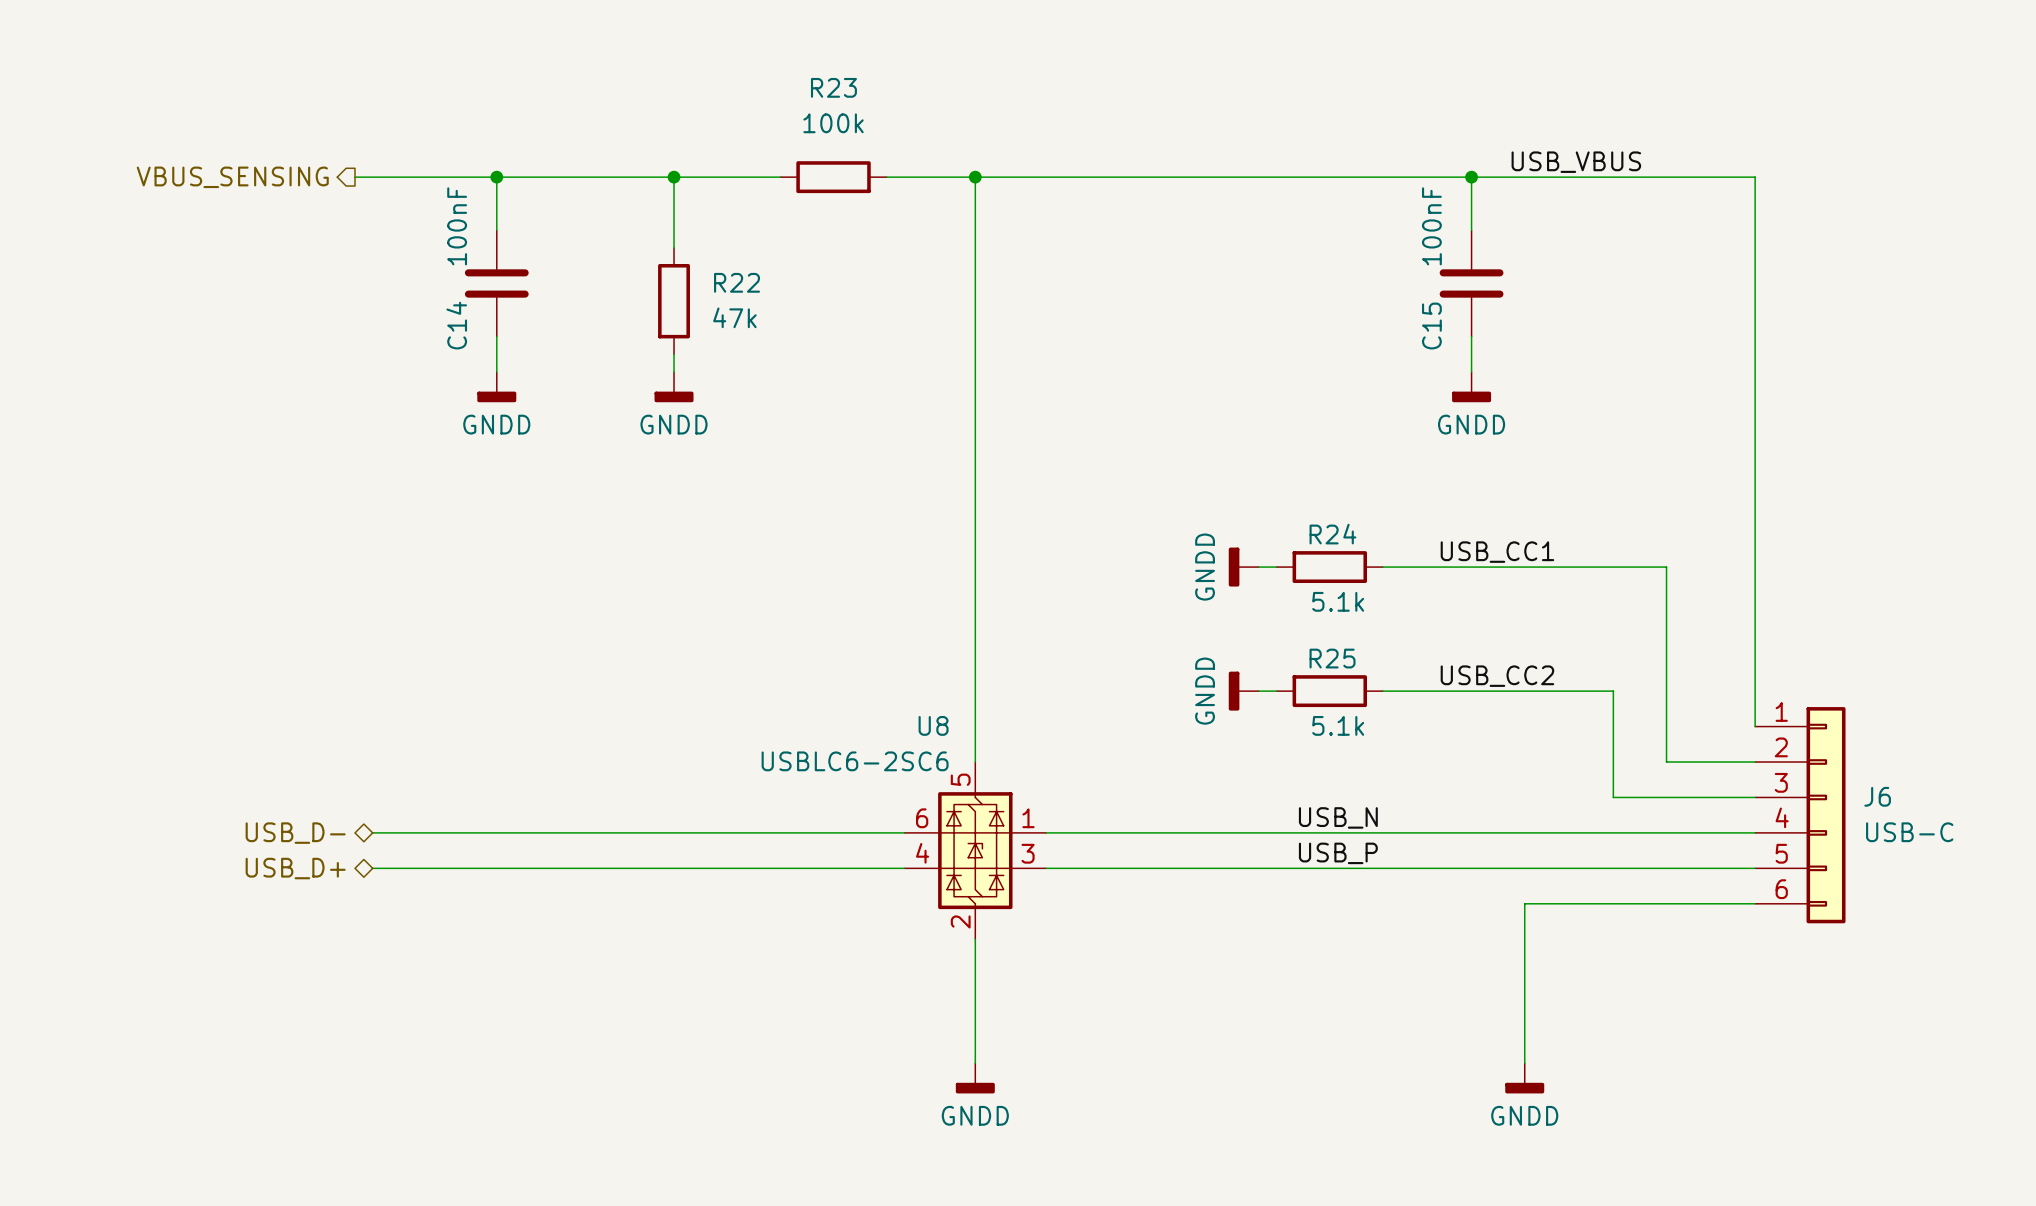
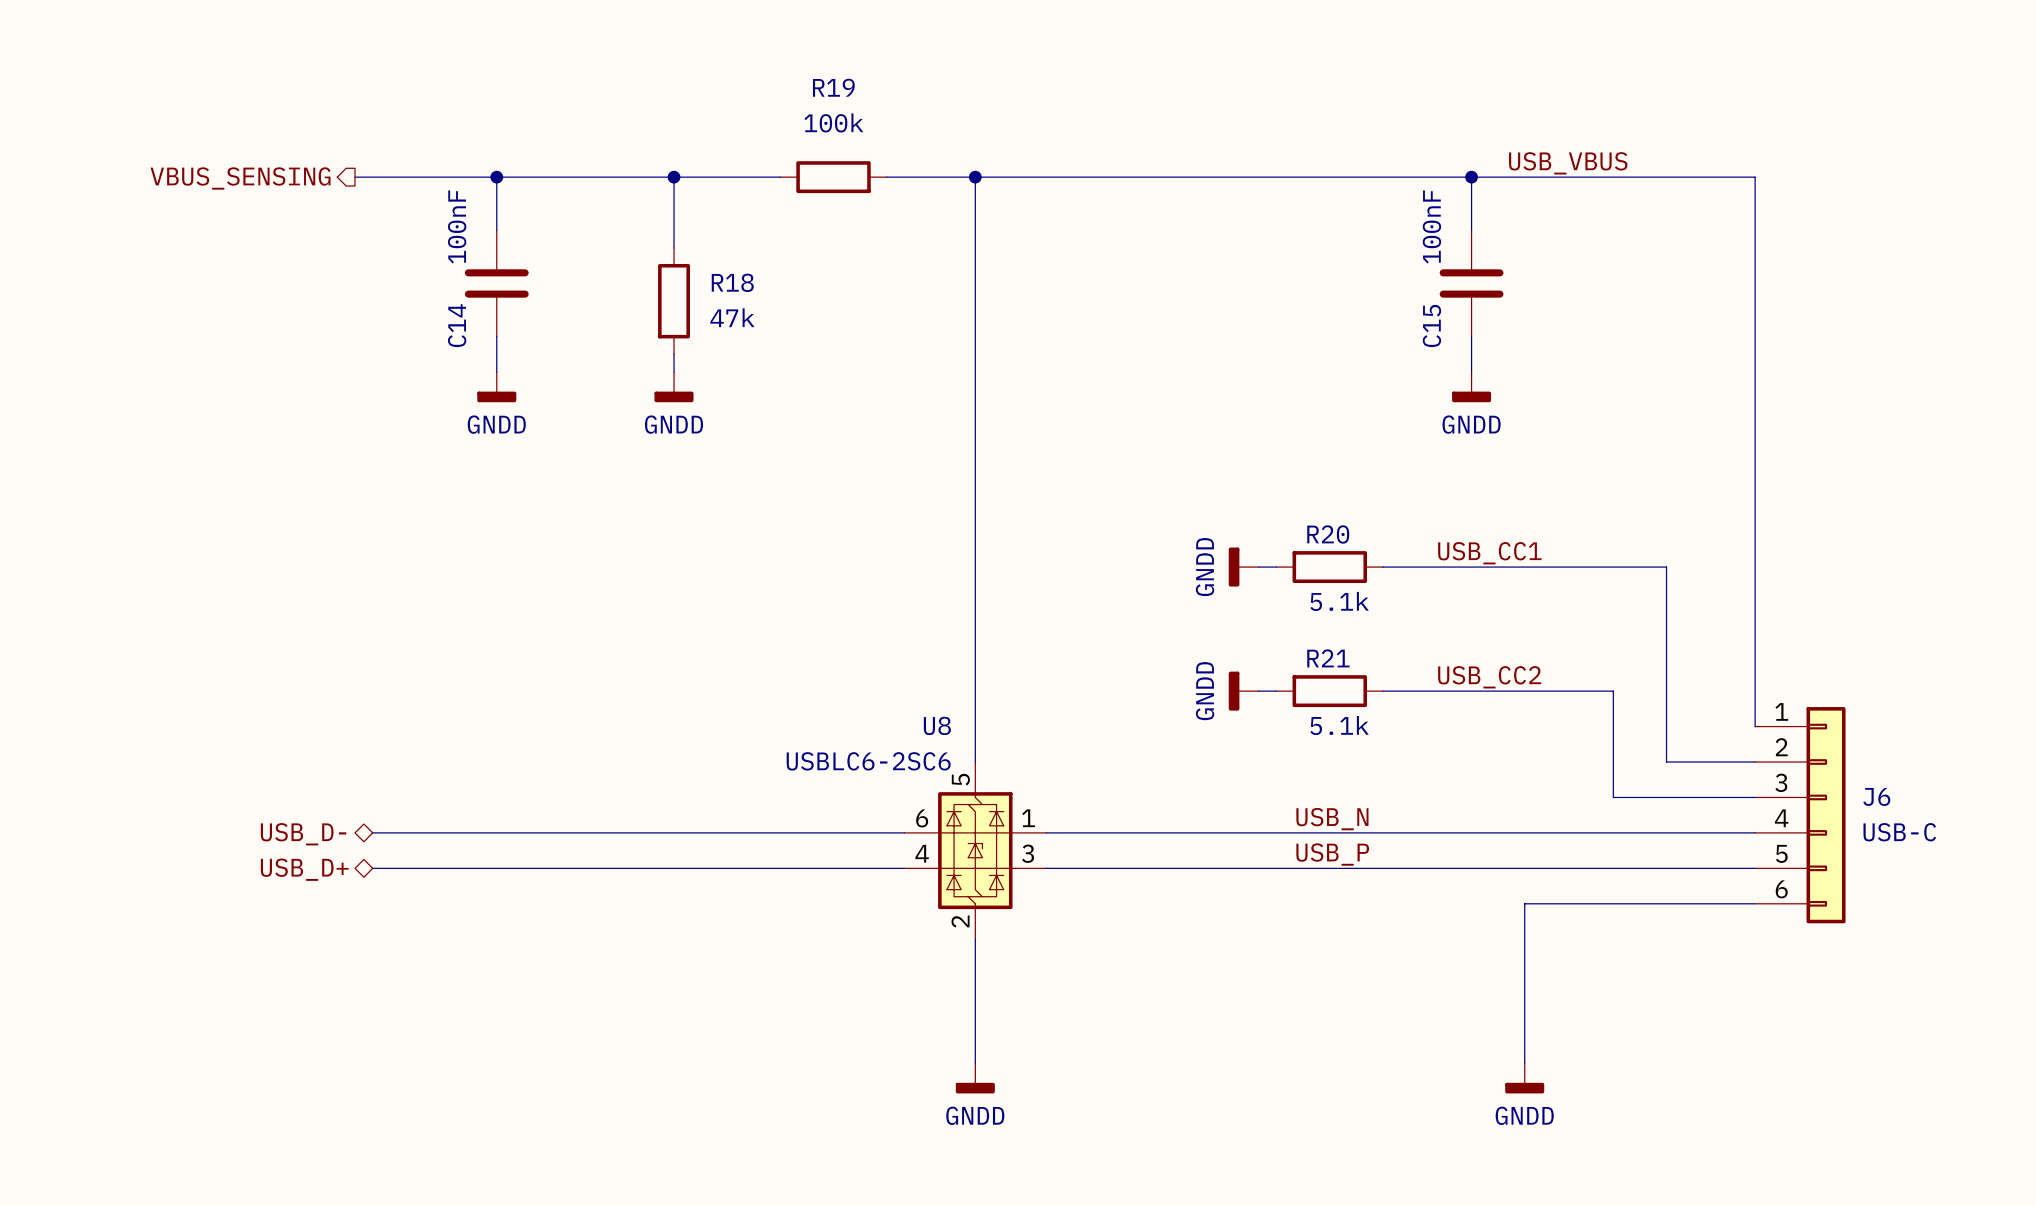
R23 name: R23 (833, 87) -> R19 (833, 87)
R22 name: R22 (737, 282) -> R18 (732, 282)
R24 name: R24 (1332, 534) -> R20 (1328, 534)
R25 name: R25 (1332, 658) -> R21 (1328, 658)

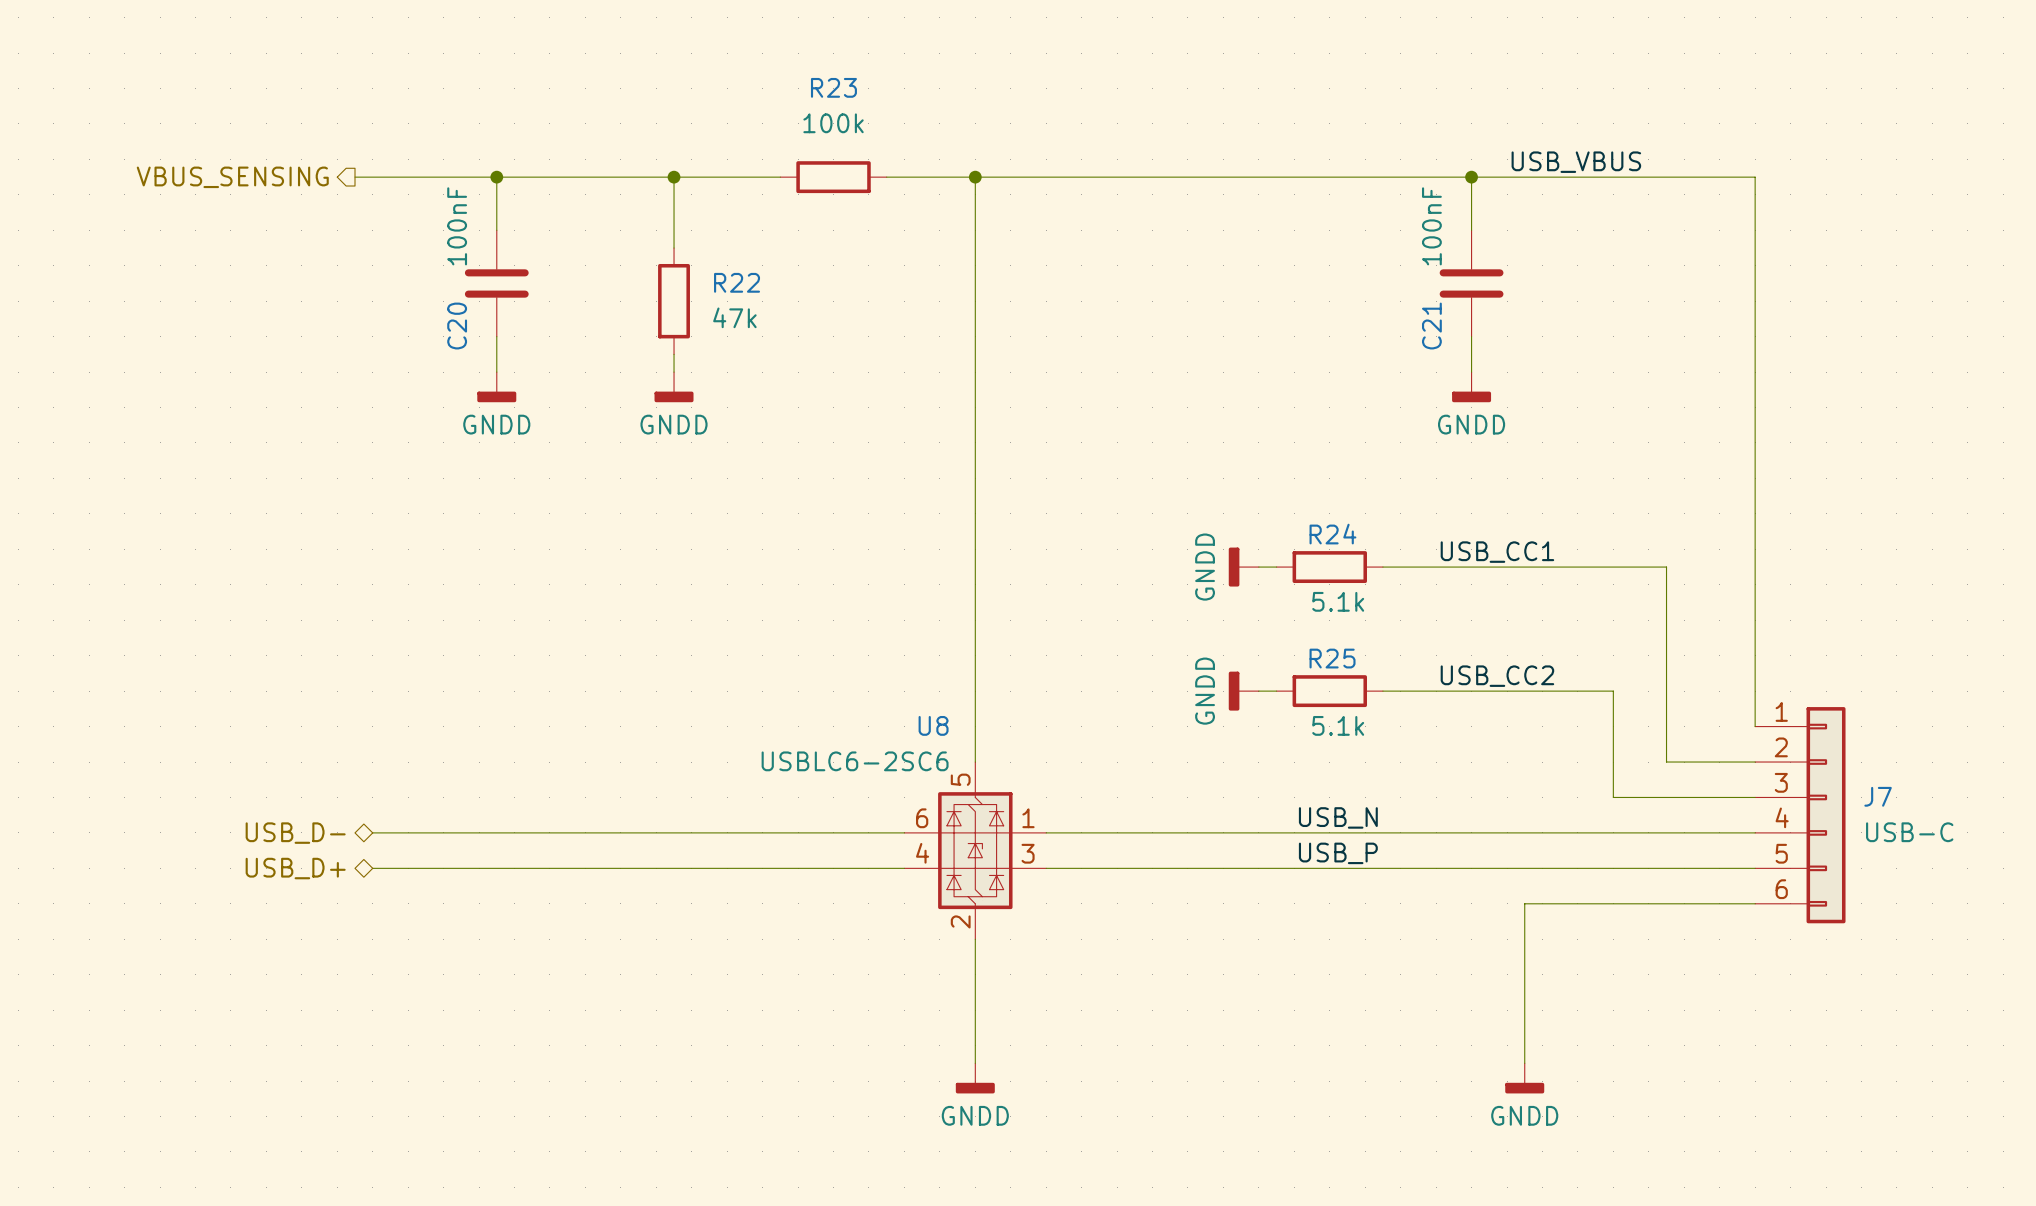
R19 name: R19 (833, 87) -> R23 (833, 87)
R18 name: R18 (732, 282) -> R22 (737, 282)
C14 name: C14 (457, 325) -> C20 (457, 326)
C15 name: C15 (1431, 325) -> C21 (1431, 326)
R20 name: R20 (1328, 534) -> R24 (1332, 534)
R21 name: R21 (1328, 658) -> R25 (1332, 658)
J6 name: J6 (1876, 796) -> J7 (1878, 796)

